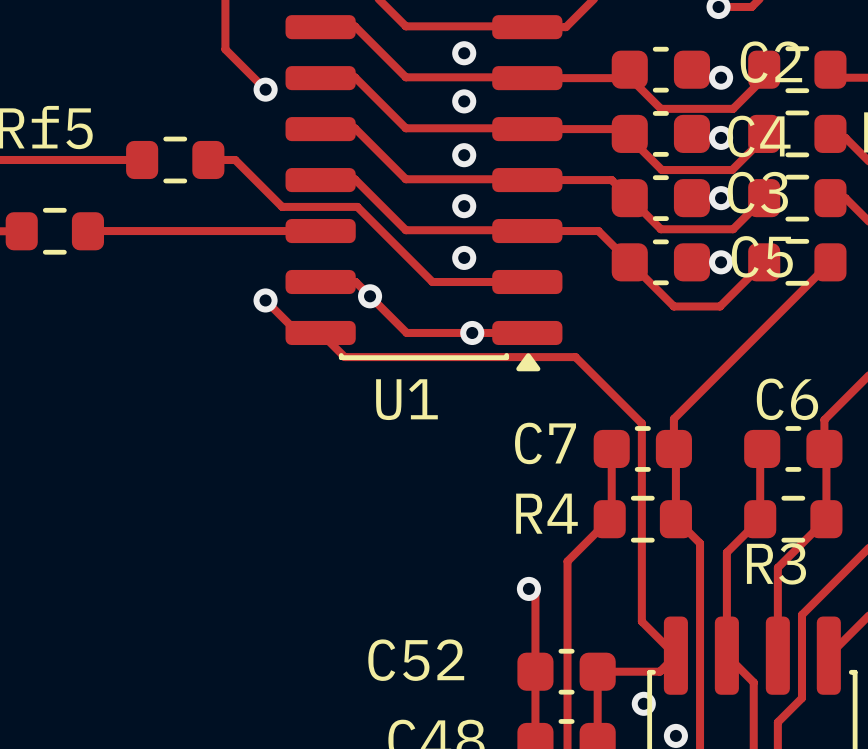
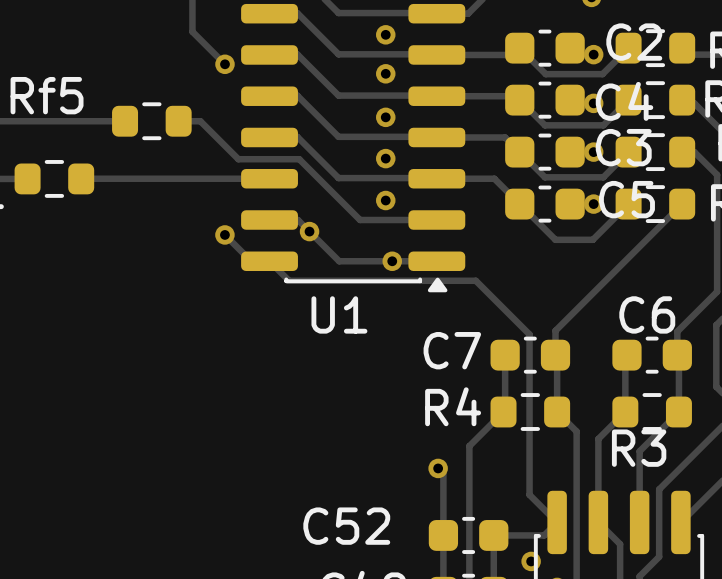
track: (629, 77) (660, 108) (733, 108) (764, 77) -> (519, 100) (544, 125) (603, 125) (628, 100)
track: (629, 137) (661, 170) (732, 170) (764, 137) -> (519, 48) (545, 74) (602, 74) (628, 48)

